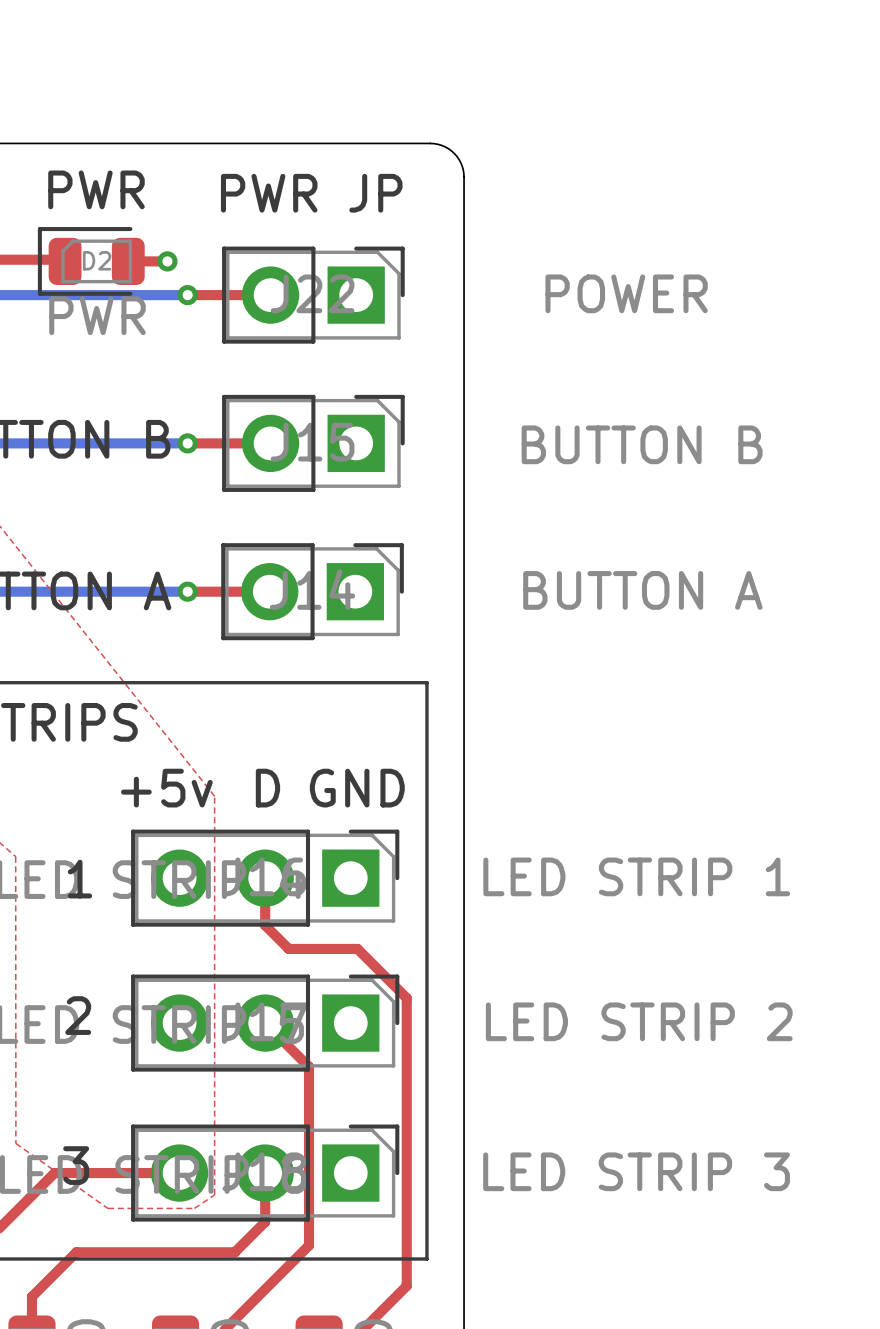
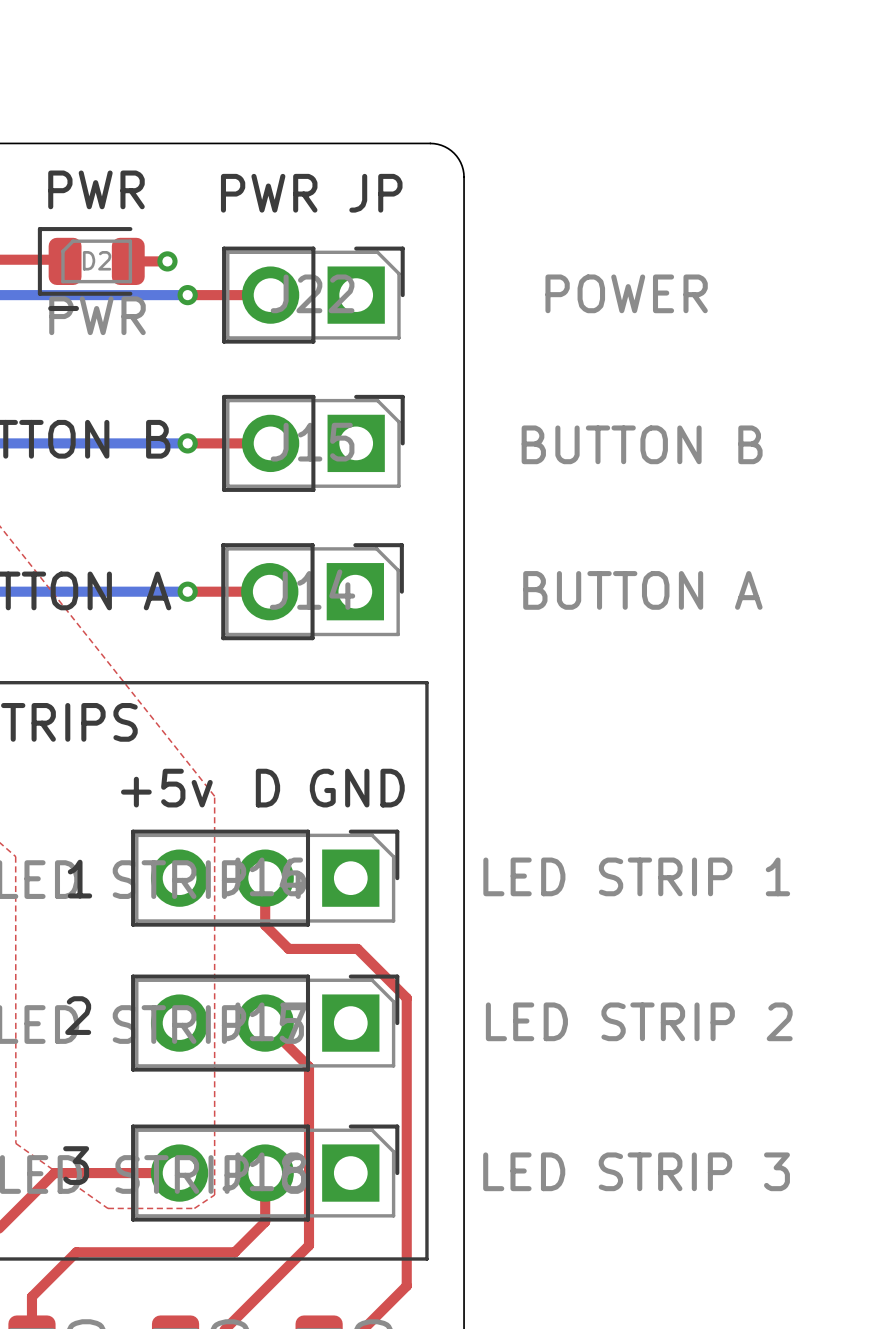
text: none -> - (63, 308)

